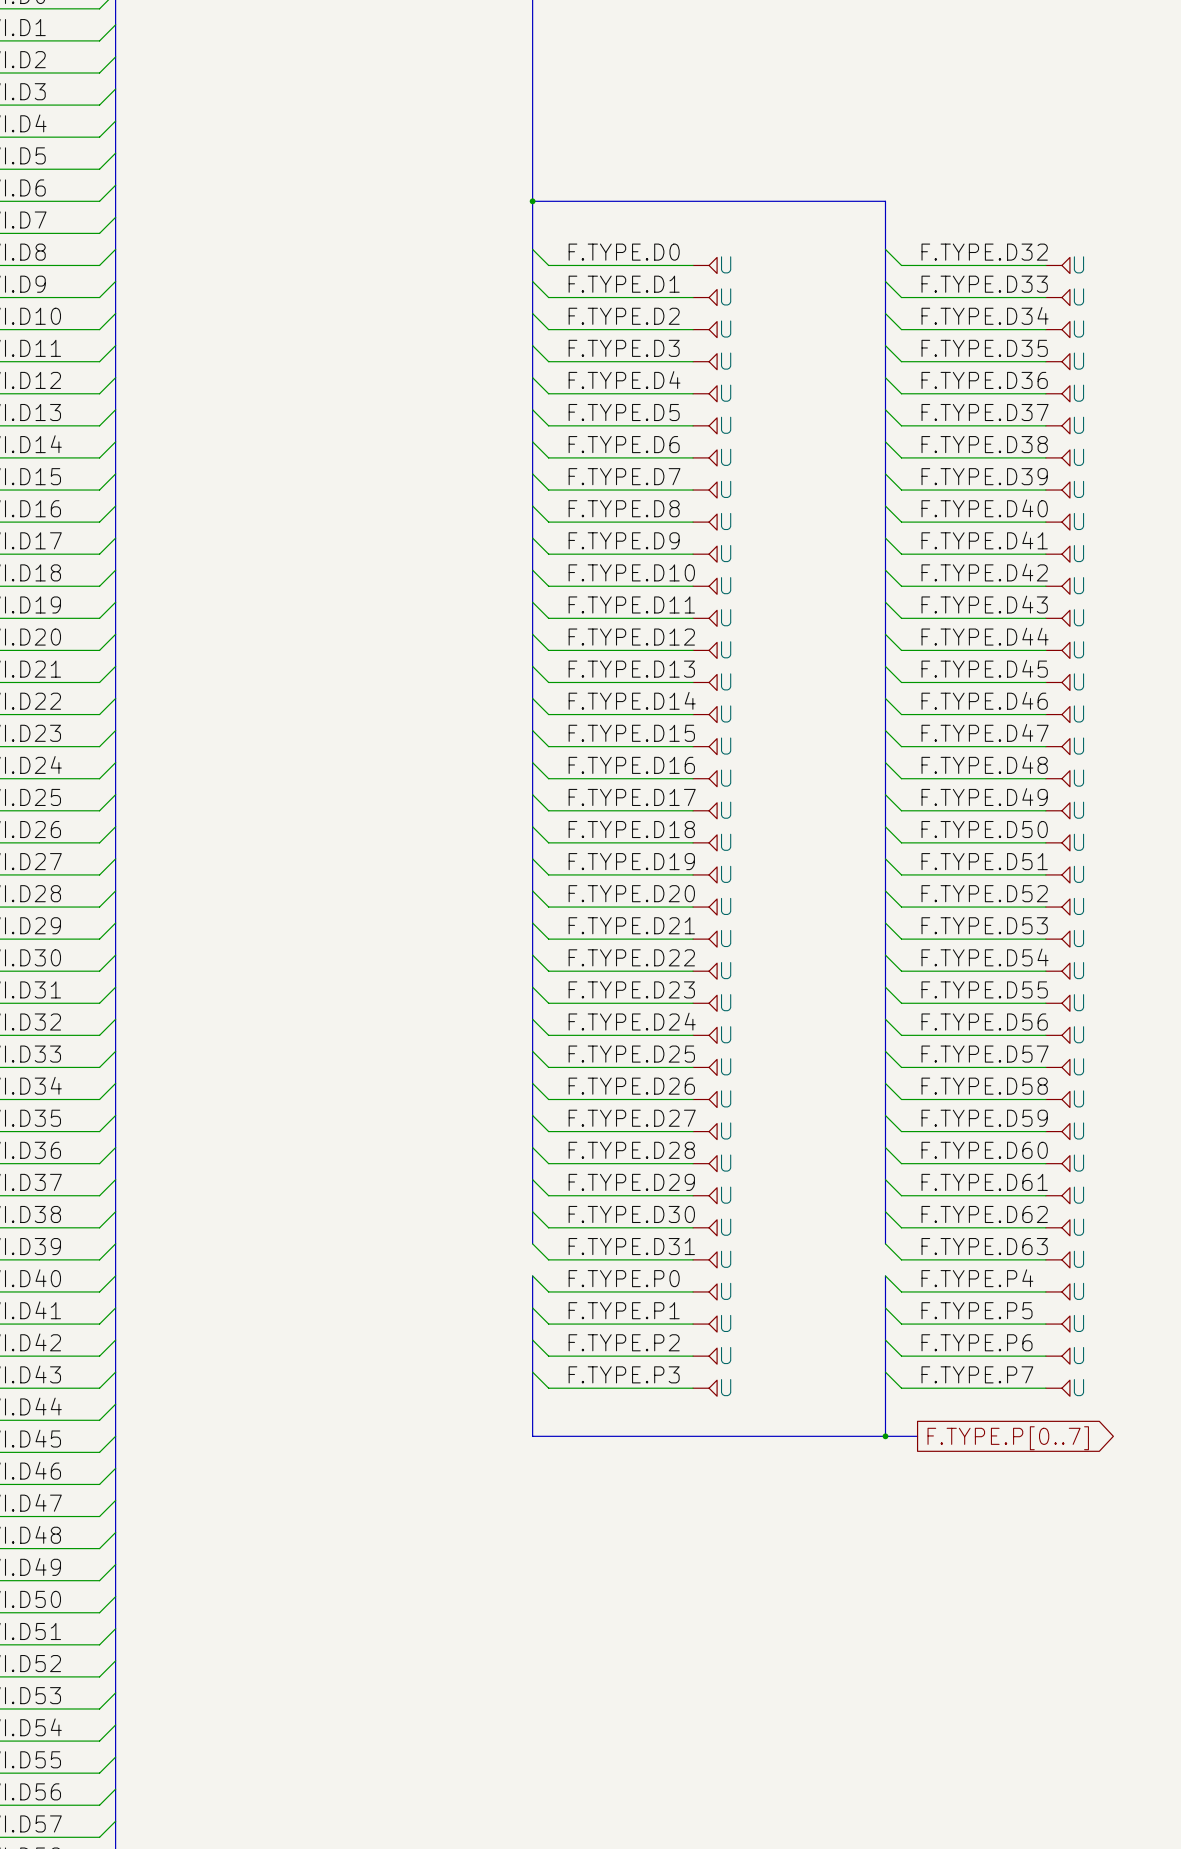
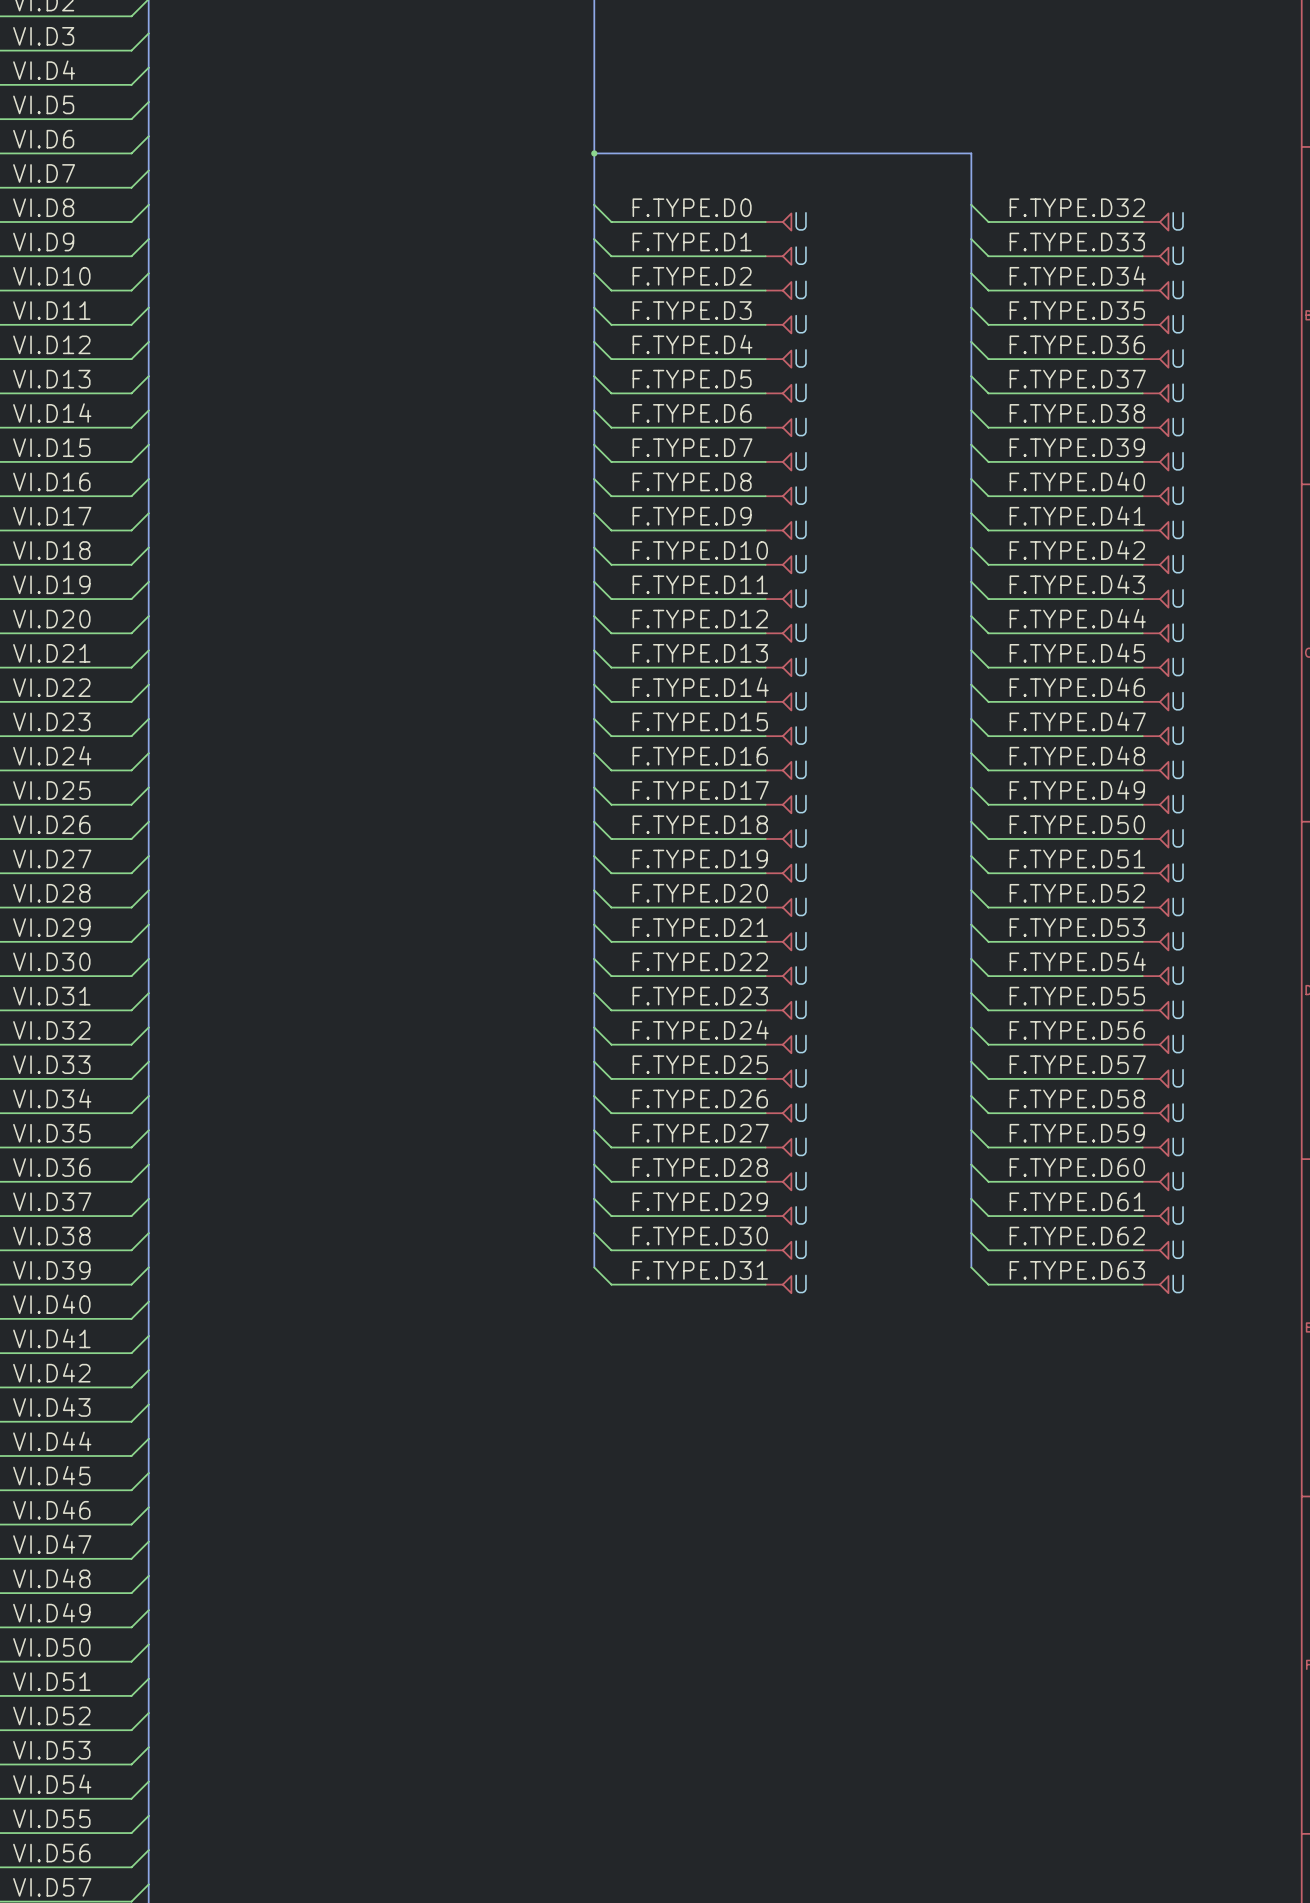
wire: (532, 1275) (548, 1291) (693, 1291) -> none
bus: (532, 1275) (532, 1436) (917, 1436) -> none
wire: (885, 1275) (901, 1291) (1045, 1291) -> none
bus: (885, 1275) (885, 1436) -> none
label: F.TYPE.P0 (624, 1278) -> none
label: F.TYPE.P4 (977, 1278) -> none
U: (705, 1291) -> none
U: (1058, 1291) -> none
wire: (532, 1308) (548, 1324) (693, 1324) -> none
wire: (885, 1308) (901, 1324) (1045, 1324) -> none
label: F.TYPE.P1 (624, 1310) -> none
label: F.TYPE.P5 (977, 1310) -> none
U: (705, 1324) -> none
U: (1058, 1324) -> none
wire: (532, 1340) (548, 1356) (693, 1356) -> none
wire: (885, 1340) (901, 1356) (1045, 1356) -> none
label: F.TYPE.P2 (624, 1342) -> none
label: F.TYPE.P6 (977, 1342) -> none
U: (705, 1356) -> none
U: (1058, 1356) -> none
wire: (532, 1372) (548, 1388) (693, 1388) -> none
wire: (885, 1372) (901, 1388) (1045, 1388) -> none
label: F.TYPE.P3 (624, 1374) -> none
label: F.TYPE.P7 (977, 1374) -> none
U: (705, 1388) -> none
U: (1058, 1388) -> none
junction: (885, 1436) -> none
global label: F.TYPE.P[0..7] (1008, 1438) -> none

